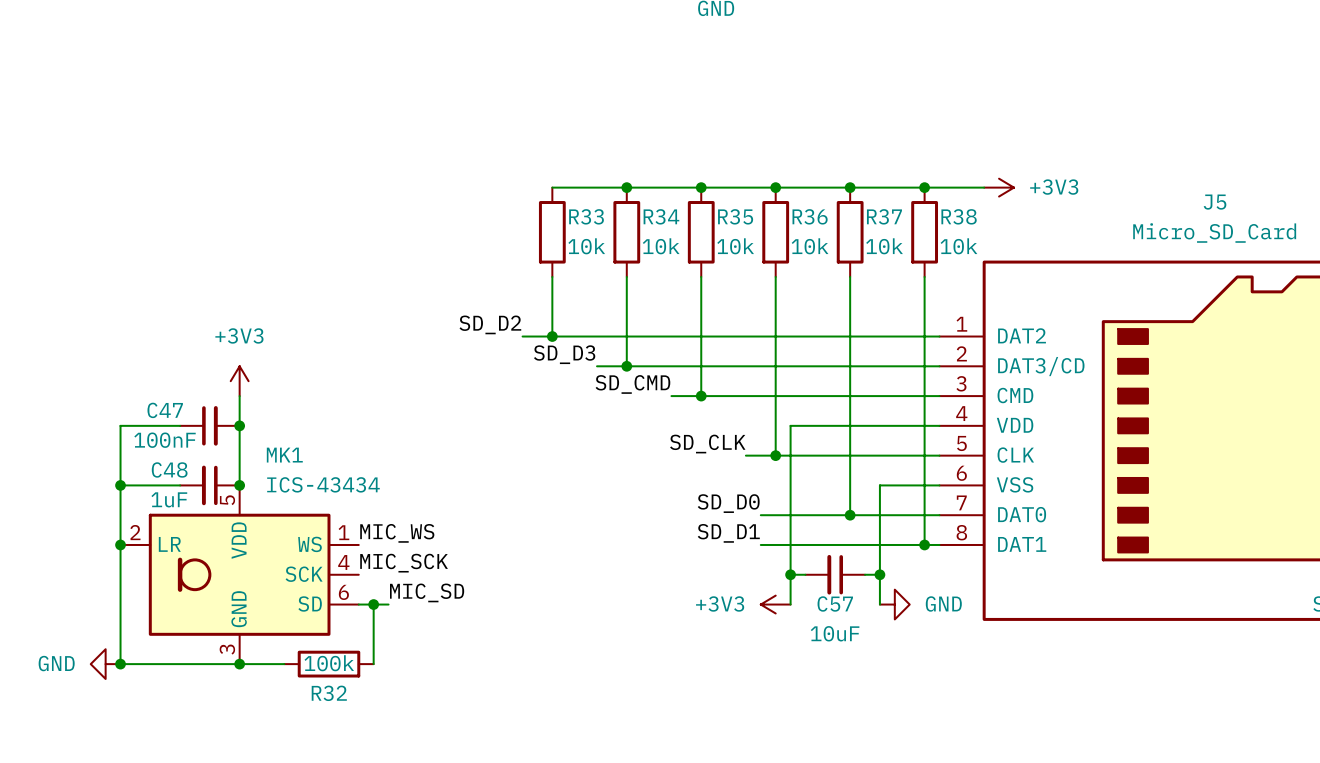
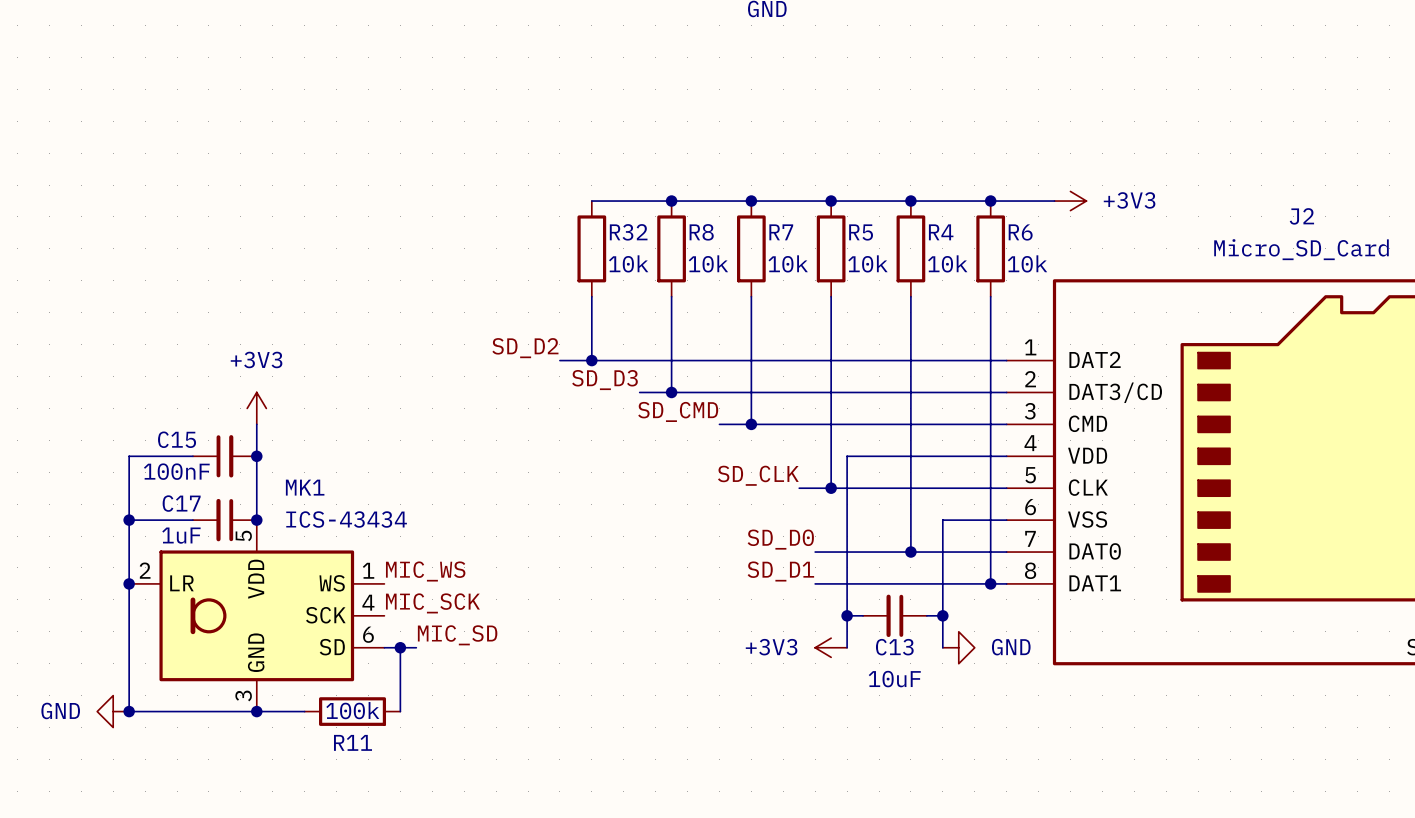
J5 name: J5 (1215, 202) -> J2 (1301, 216)
R33 name: R33 (586, 216) -> R32 (628, 232)
R34 name: R34 (661, 216) -> R8 (701, 232)
R35 name: R35 (735, 216) -> R7 (781, 232)
R36 name: R36 (810, 216) -> R5 (861, 232)
R37 name: R37 (884, 216) -> R4 (941, 232)
R38 name: R38 (959, 216) -> R6 (1020, 232)
C47 name: C47 (165, 410) -> C15 (177, 439)
C48 name: C48 (169, 469) -> C17 (181, 503)
C57 name: C57 (835, 603) -> C13 (894, 647)
R32 name: R32 (329, 693) -> R11 (352, 742)

